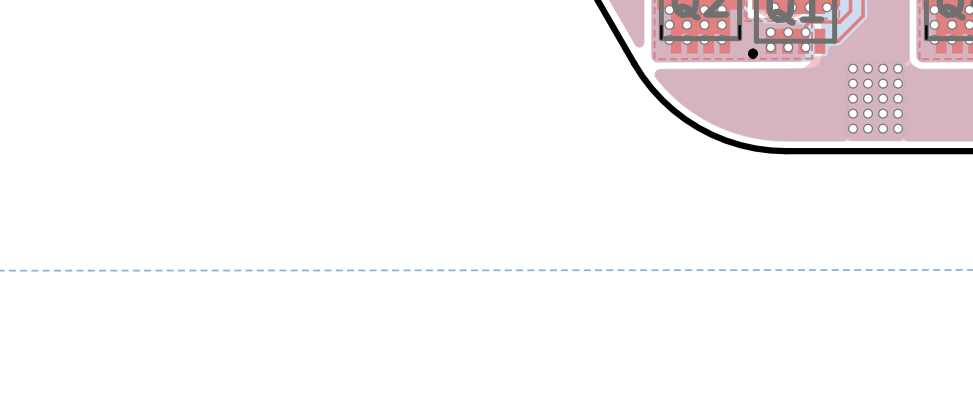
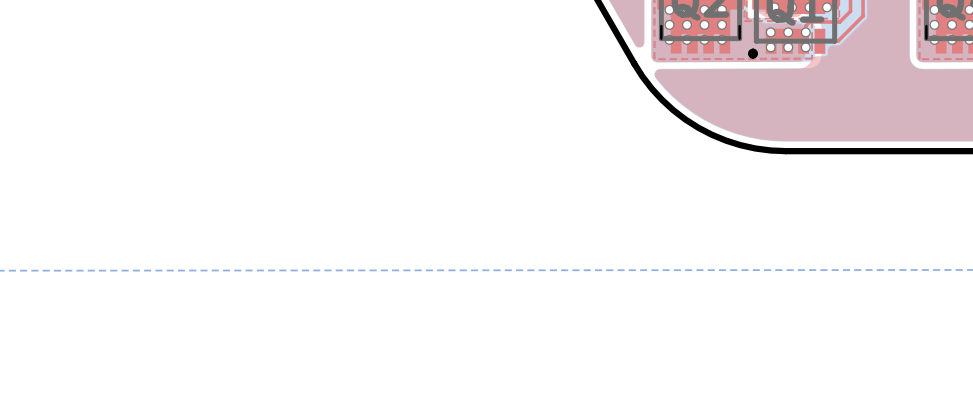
via: (853, 68) -> none
via: (868, 68) -> none
via: (883, 68) -> none
via: (898, 68) -> none
via: (853, 83) -> none
via: (868, 83) -> none
via: (883, 83) -> none
via: (898, 83) -> none
via: (853, 98) -> none
via: (868, 98) -> none
via: (883, 98) -> none
via: (898, 98) -> none
via: (853, 113) -> none
via: (868, 113) -> none
via: (883, 113) -> none
via: (898, 113) -> none
via: (853, 128) -> none
via: (868, 128) -> none
via: (883, 128) -> none
via: (898, 128) -> none

